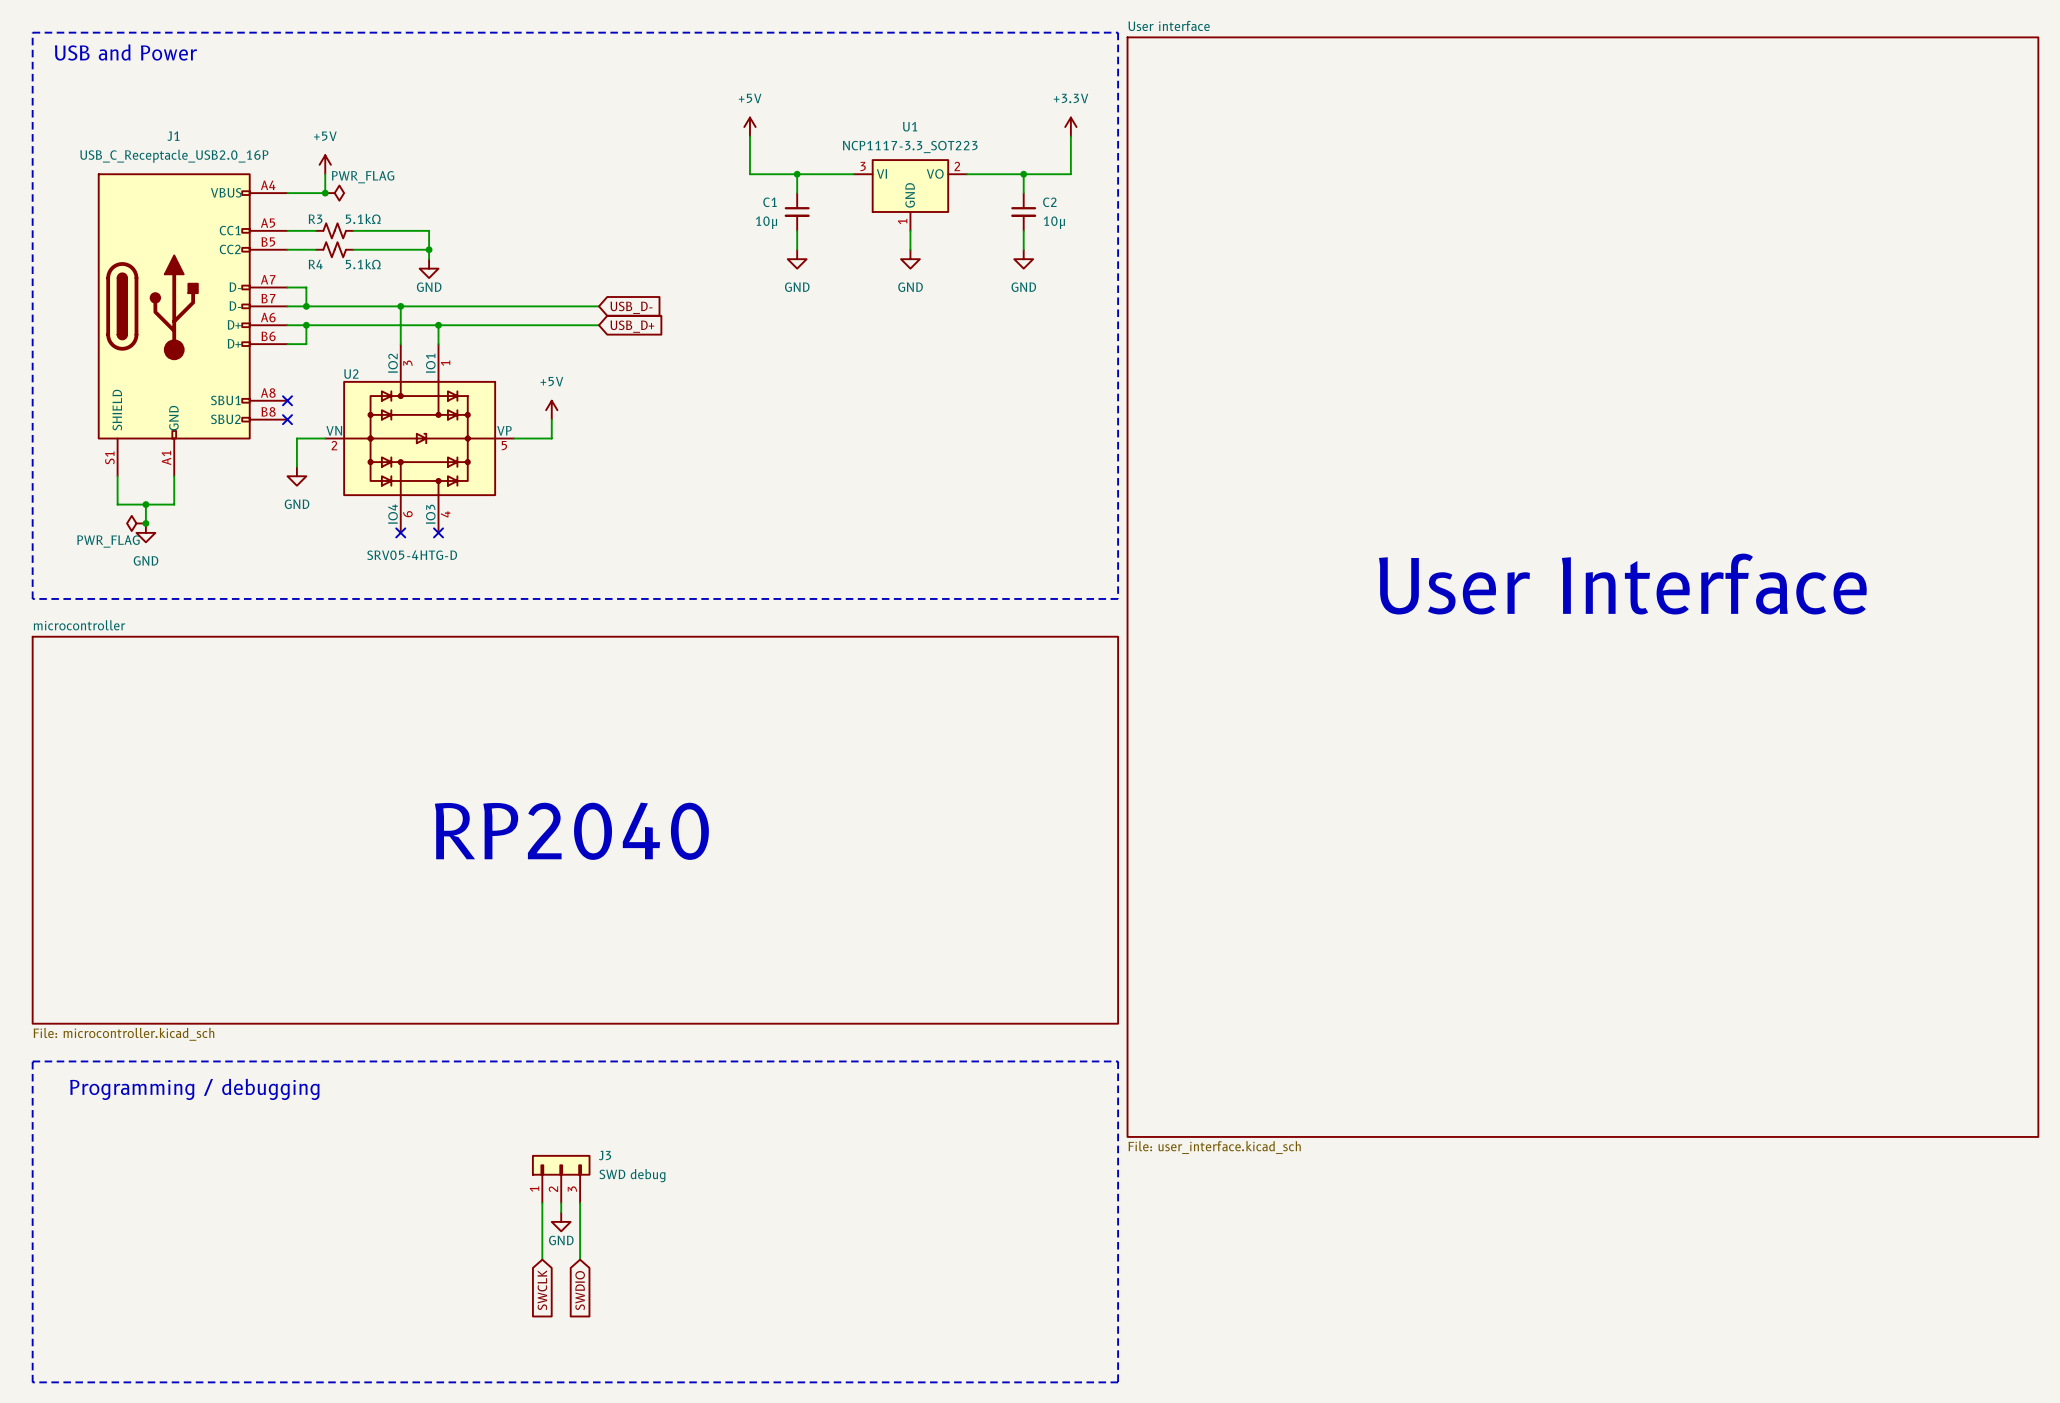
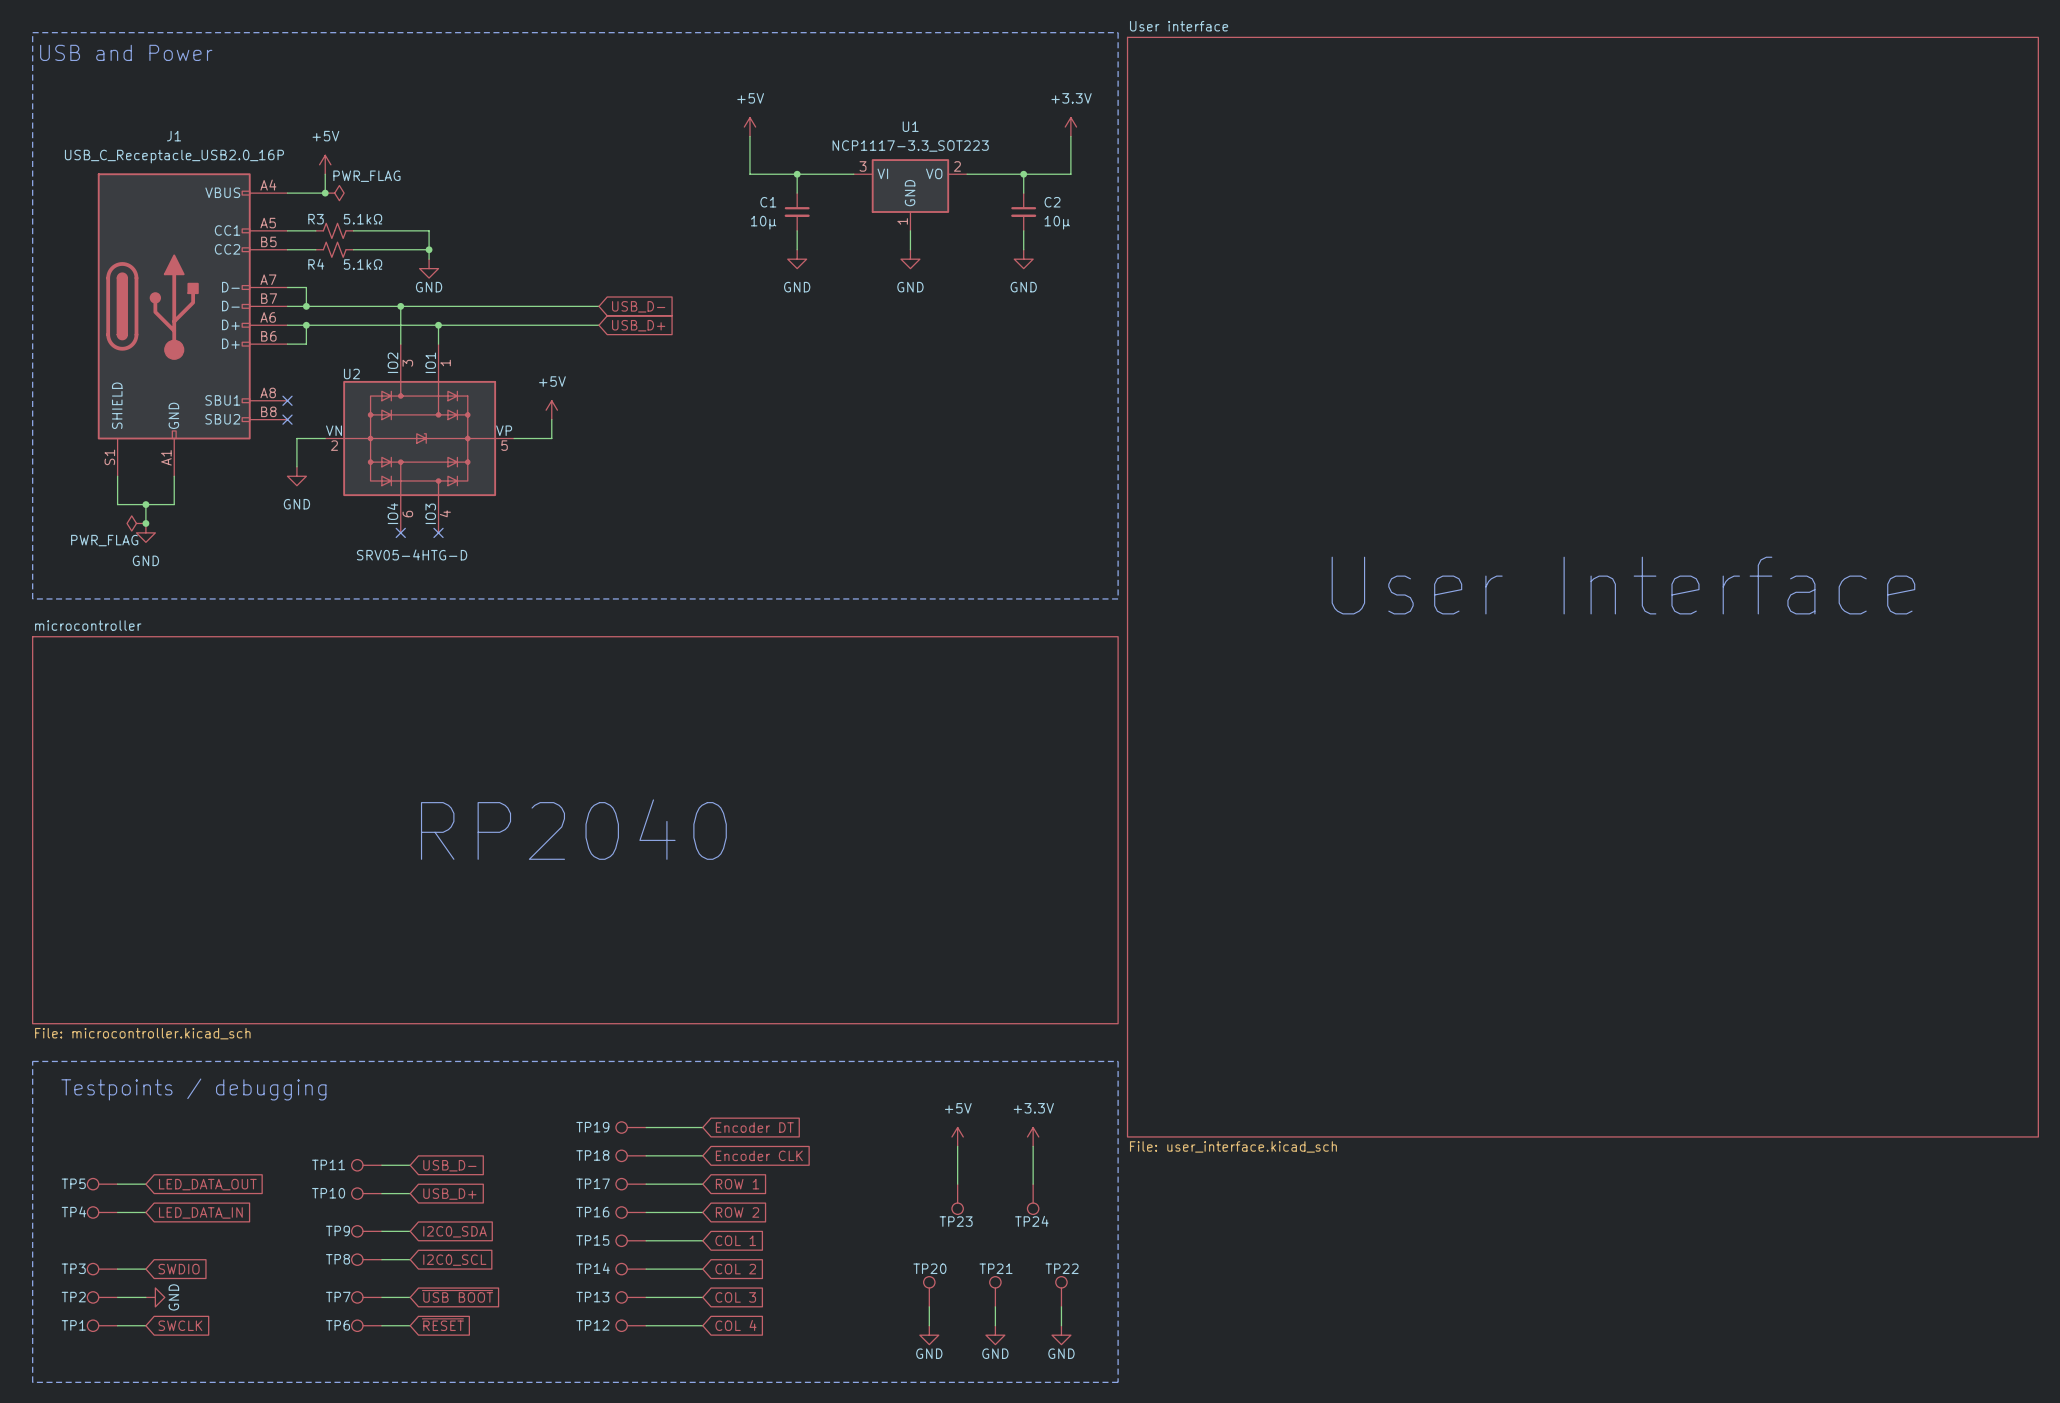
text: Programming / debugging (194, 1089) -> Testpoints / debugging (193, 1089)
TP19: none -> (631, 1127)
wire: none -> (646, 1127) (702, 1127)
global label: none -> Encoder DT (754, 1127)
power symbol: none -> +5V (957, 1136)
power symbol: none -> +3.3V (1033, 1136)
wire: none -> (957, 1146) (957, 1184)
wire: none -> (1033, 1146) (1033, 1184)
TP18: none -> (631, 1155)
wire: none -> (646, 1155) (702, 1155)
global label: none -> Encoder CLK (759, 1155)
TP11: none -> (366, 1165)
wire: none -> (381, 1165) (410, 1165)
global label: none -> USB_D- (449, 1165)
J3: SWD debug (561, 1178) -> none
TP5: none -> (102, 1184)
wire: none -> (117, 1184) (145, 1184)
TP17: none -> (631, 1184)
wire: none -> (646, 1184) (702, 1184)
global label: none -> ROW 1 (737, 1184)
global label: none -> LED_DATA_OUT (207, 1184)
TP10: none -> (366, 1193)
wire: none -> (381, 1193) (410, 1193)
global label: none -> USB_D+ (449, 1194)
TP23: none -> (957, 1199)
TP24: none -> (1033, 1199)
wire: (542, 1203) (542, 1259) -> none
wire: (561, 1203) (561, 1212) -> none
wire: (580, 1203) (580, 1259) -> none
TP4: none -> (102, 1212)
wire: none -> (117, 1212) (145, 1212)
TP16: none -> (631, 1212)
wire: none -> (646, 1212) (702, 1212)
global label: none -> ROW 2 (737, 1212)
global label: none -> LED_DATA_IN (200, 1212)
power symbol: GND (561, 1221) -> none
TP9: none -> (366, 1231)
wire: none -> (381, 1231) (410, 1231)
global label: none -> I2C0_SDA (455, 1231)
TP15: none -> (631, 1240)
wire: none -> (646, 1240) (702, 1240)
global label: none -> COL 1 (735, 1240)
TP8: none -> (366, 1259)
wire: none -> (381, 1259) (410, 1259)
global label: none -> I2C0_SCL (454, 1260)
TP3: none -> (102, 1269)
wire: none -> (117, 1269) (145, 1269)
global label: none -> SWDIO (179, 1269)
TP14: none -> (631, 1269)
wire: none -> (646, 1269) (702, 1269)
global label: none -> COL 2 (735, 1269)
global label: SWCLK (542, 1290) -> none
global label: SWDIO (580, 1290) -> none
TP20: none -> (929, 1291)
TP21: none -> (995, 1291)
TP22: none -> (1061, 1291)
global label: none -> ~{USB BOOT} (457, 1296)
TP2: none -> (102, 1297)
wire: none -> (117, 1297) (145, 1297)
power symbol: none -> GND (155, 1297)
TP7: none -> (366, 1297)
wire: none -> (381, 1297) (410, 1297)
TP13: none -> (631, 1297)
wire: none -> (646, 1297) (702, 1297)
global label: none -> COL 3 (735, 1297)
wire: none -> (929, 1306) (929, 1325)
wire: none -> (995, 1306) (995, 1325)
wire: none -> (1061, 1306) (1061, 1325)
global label: none -> ~{RESET} (442, 1324)
TP1: none -> (102, 1325)
wire: none -> (117, 1325) (145, 1325)
global label: none -> SWCLK (180, 1325)
TP6: none -> (366, 1325)
wire: none -> (381, 1325) (410, 1325)
TP12: none -> (631, 1325)
wire: none -> (646, 1325) (702, 1325)
global label: none -> COL 4 (735, 1325)
power symbol: none -> GND (929, 1335)
power symbol: none -> GND (995, 1335)
power symbol: none -> GND (1061, 1335)

